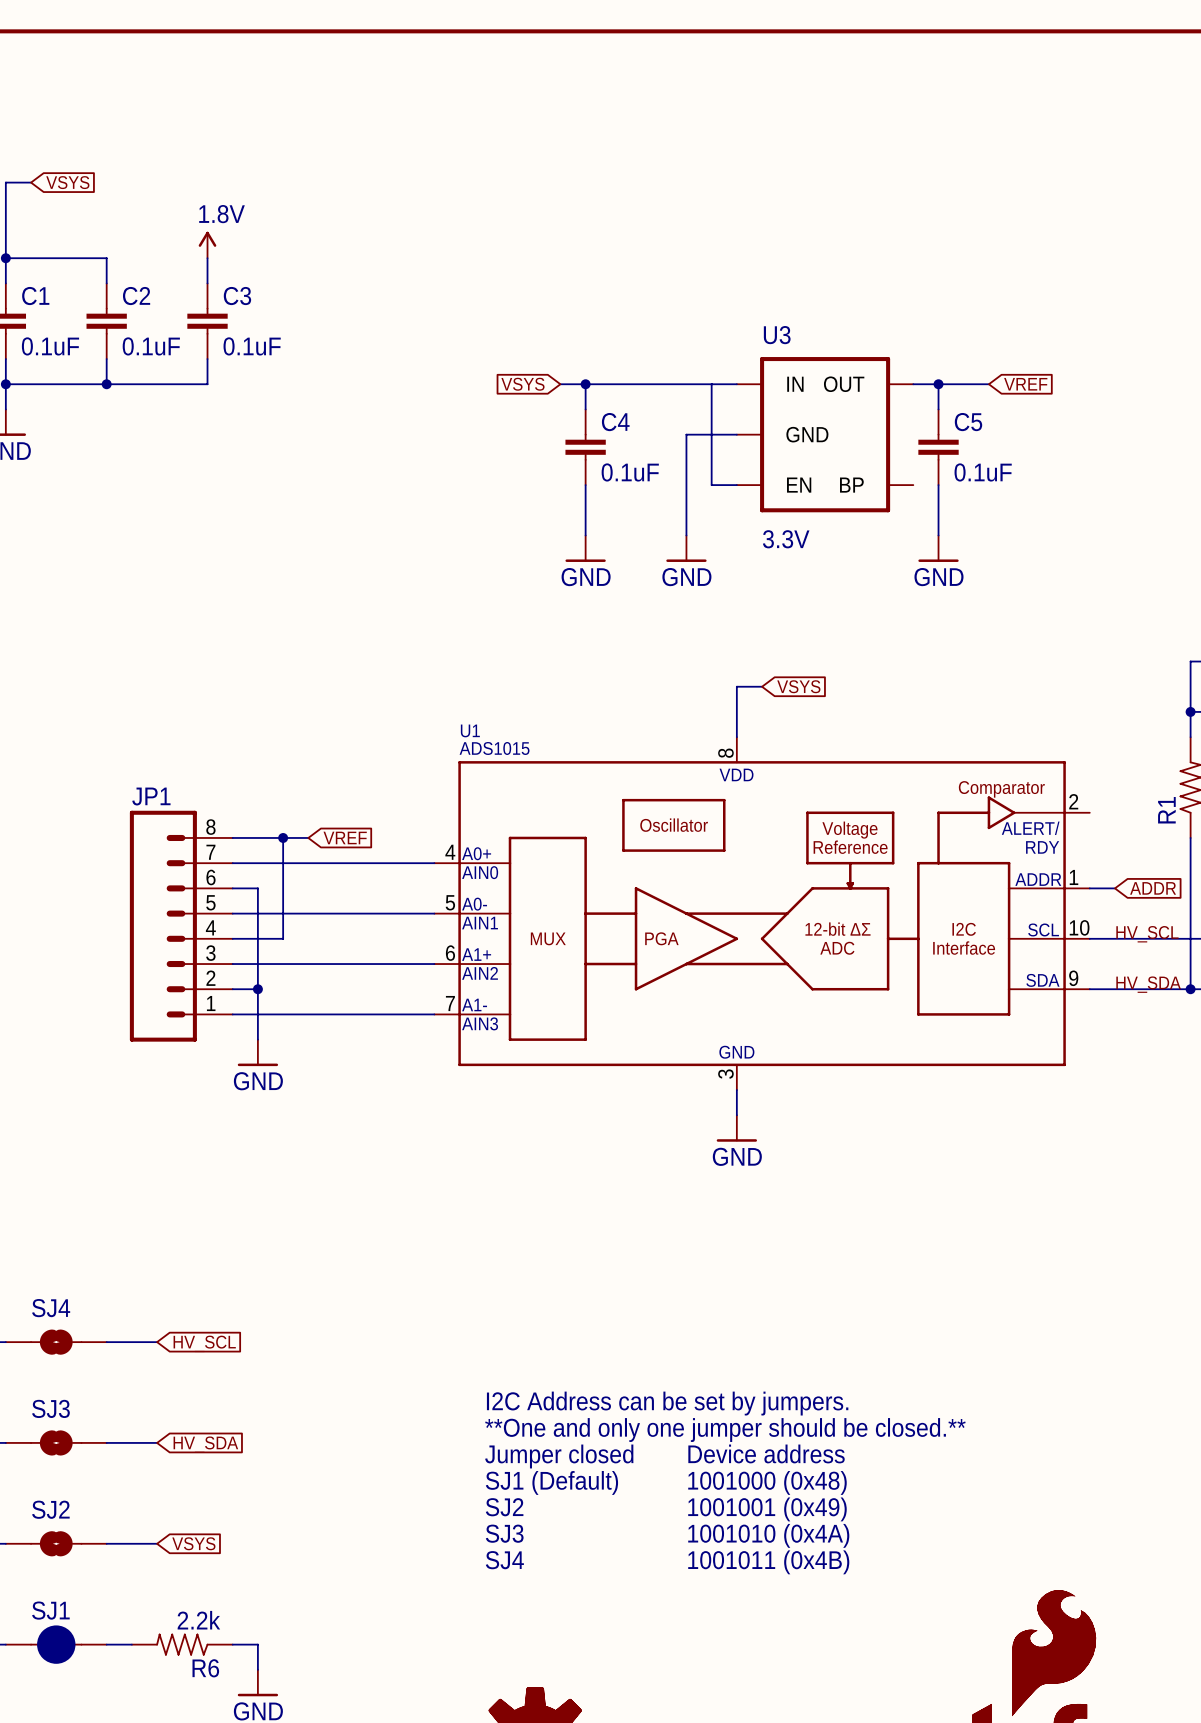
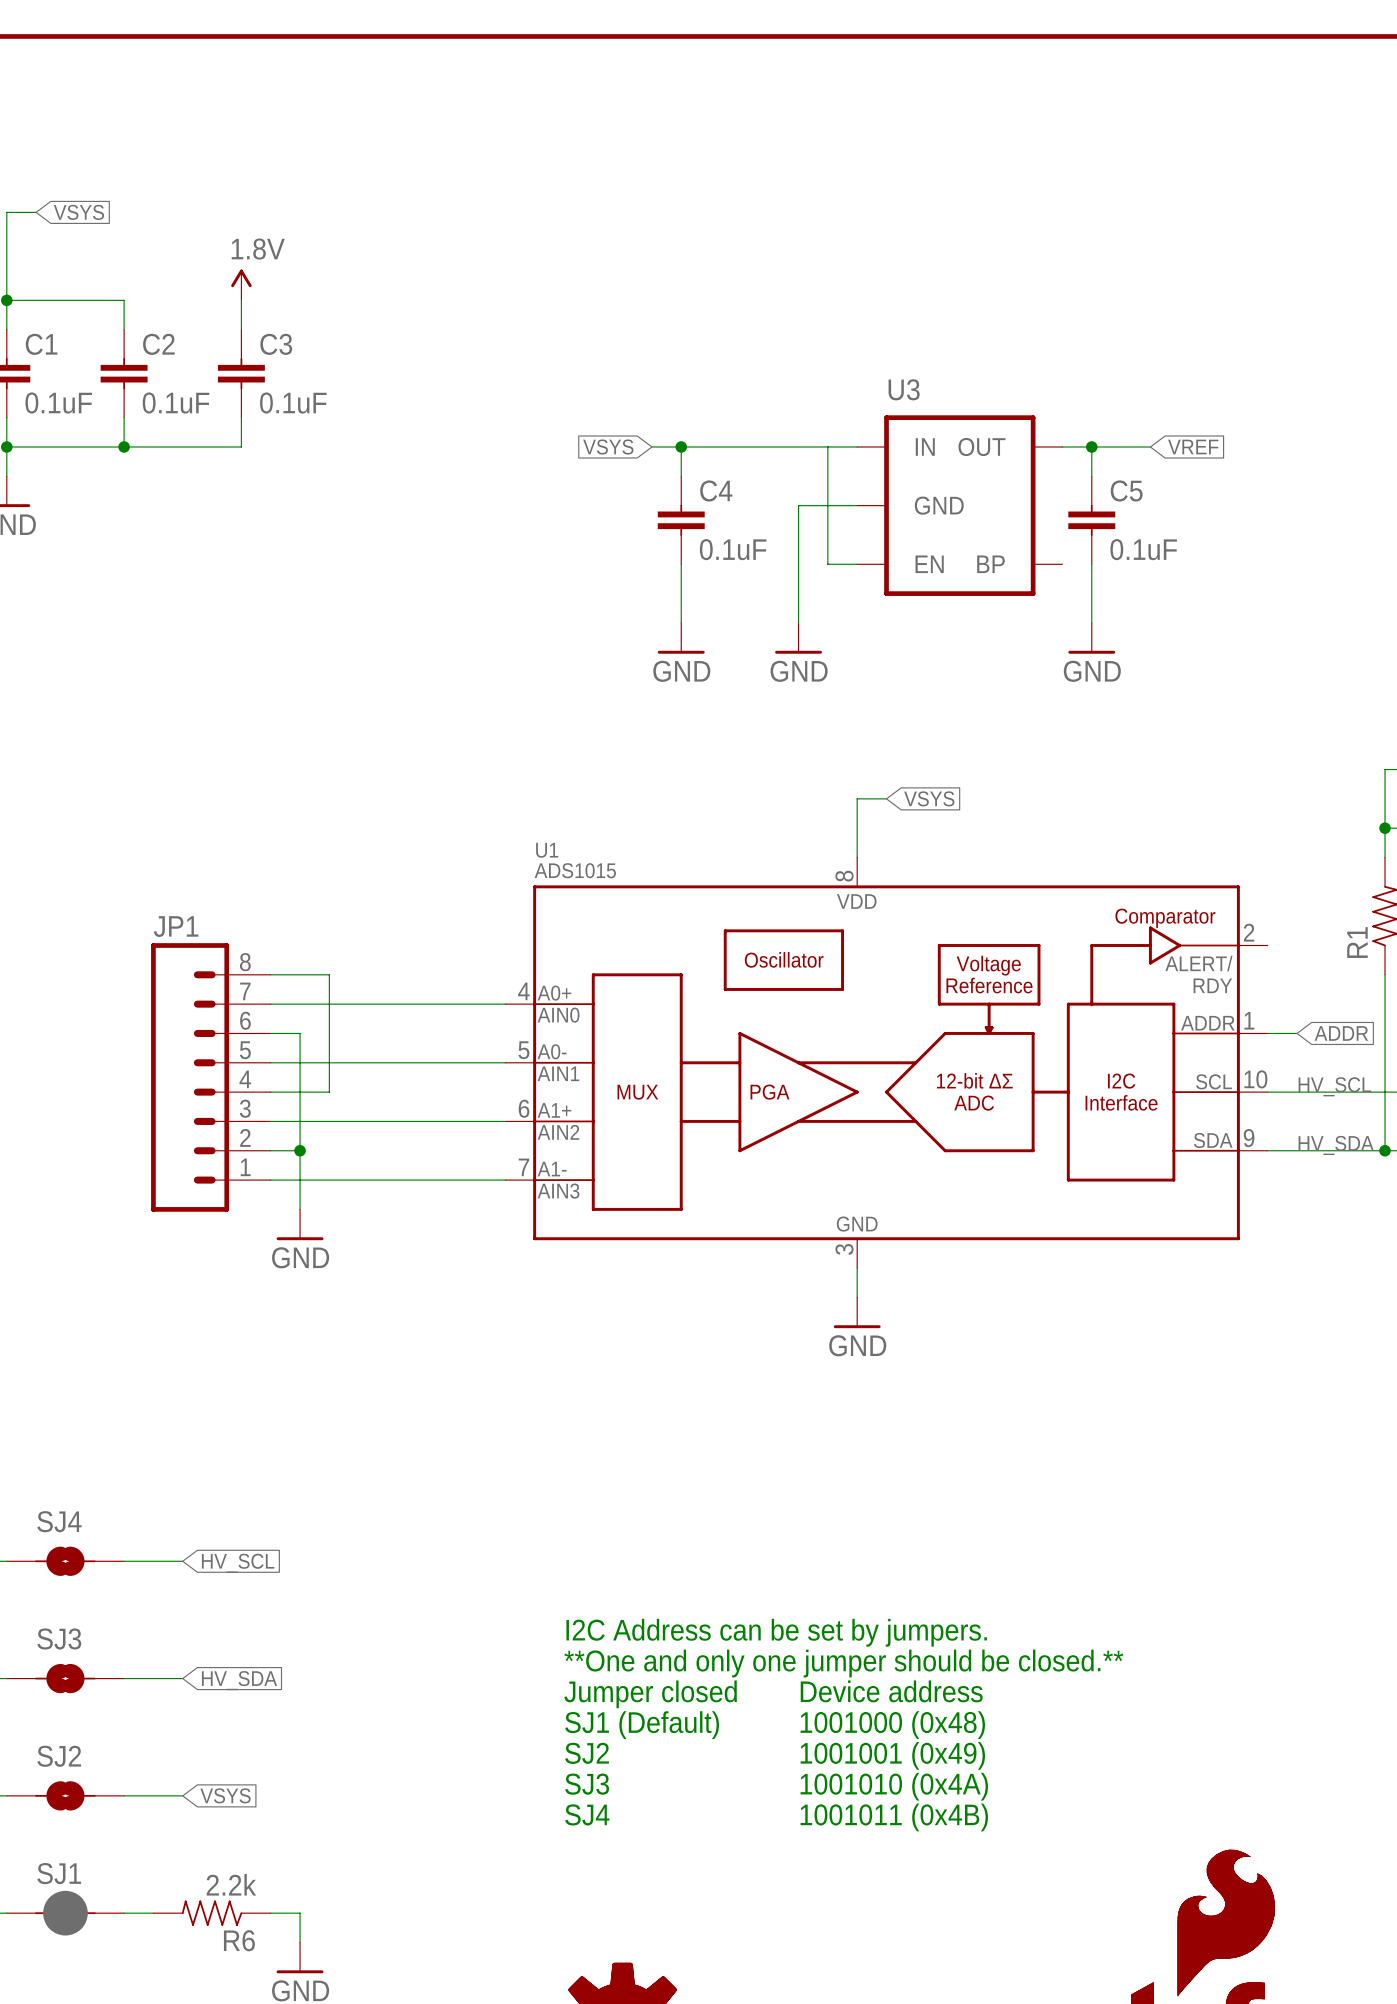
U3 value: 3.3V (786, 539) -> none
wire: (283, 837) (308, 837) -> none
junction: (283, 837) -> none
global label: VREF (345, 837) -> none

